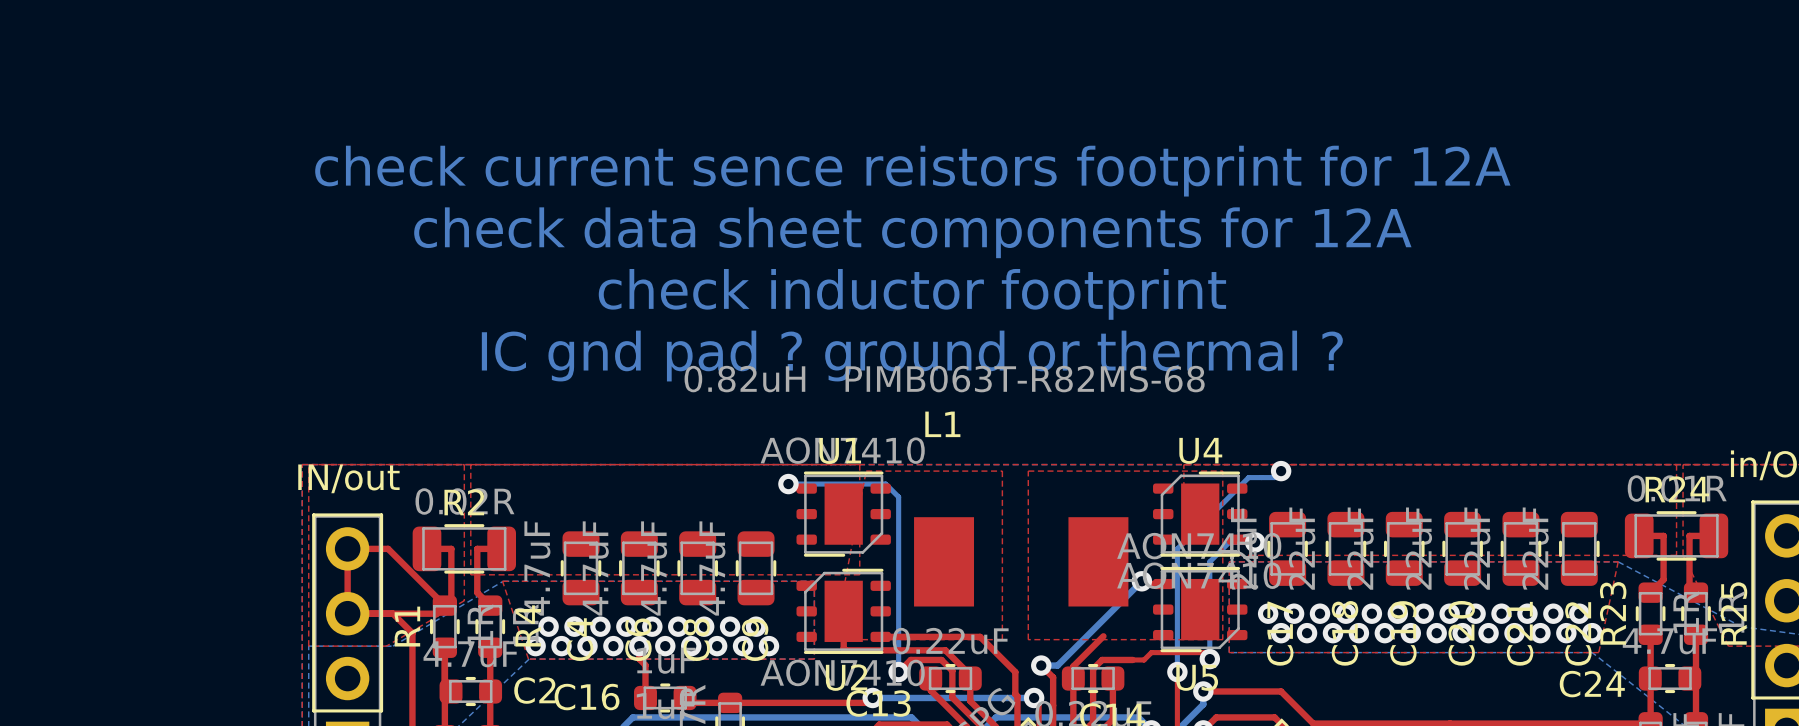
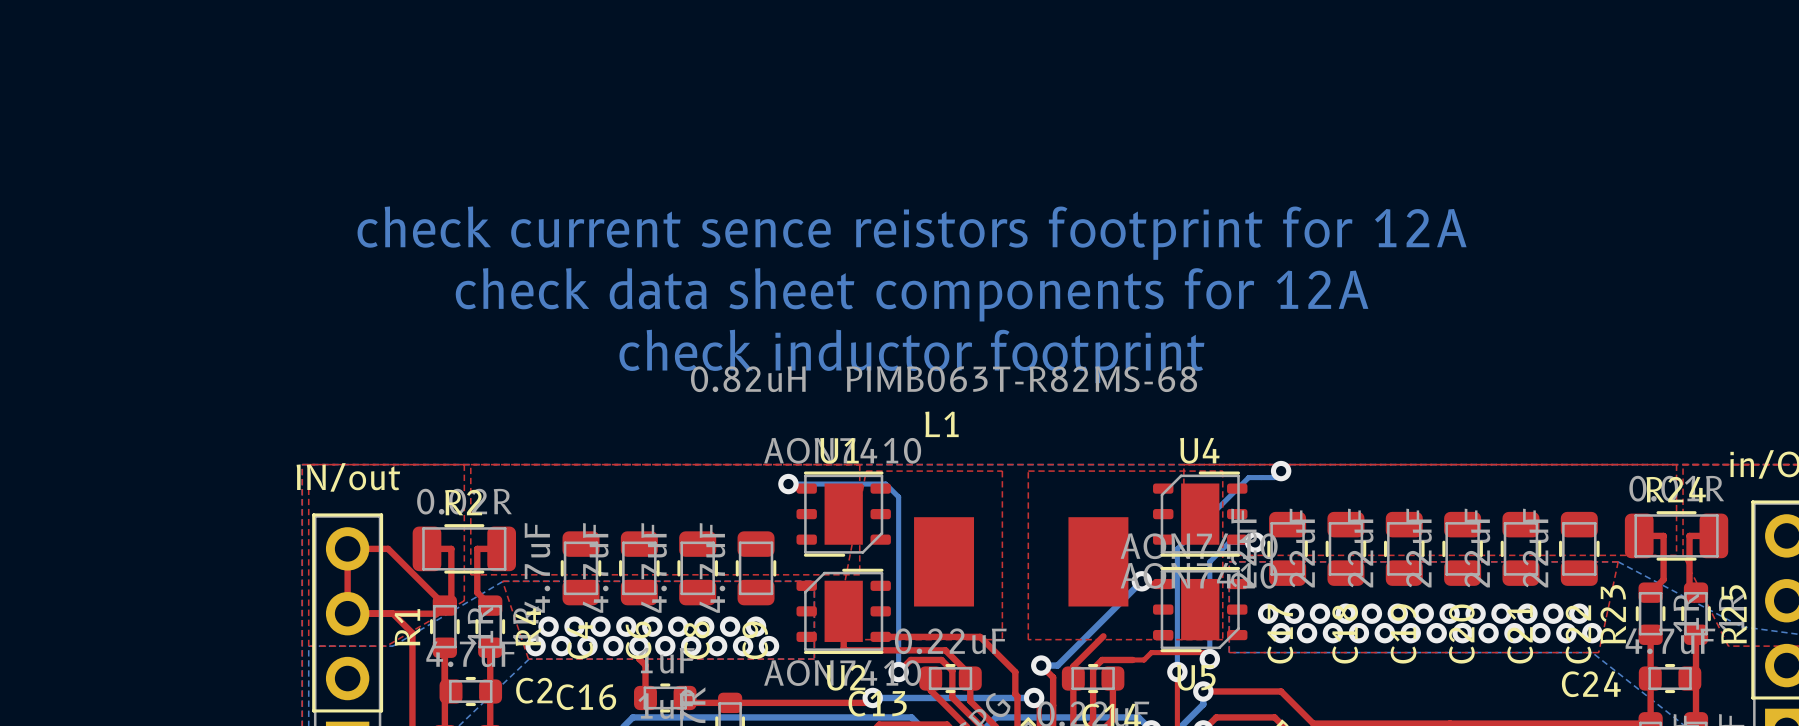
text: check current sence reistors footprint for 12A (912, 171) -> none
text: check data sheet components for 12A (912, 232) -> check current sence reistors footprint for 12A (912, 233)
text: check inductor footprint (912, 294) -> check data sheet components for 12A (912, 294)
text: IC gnd pad ? ground or thermal ? (912, 356) -> check inductor footprint (911, 356)

